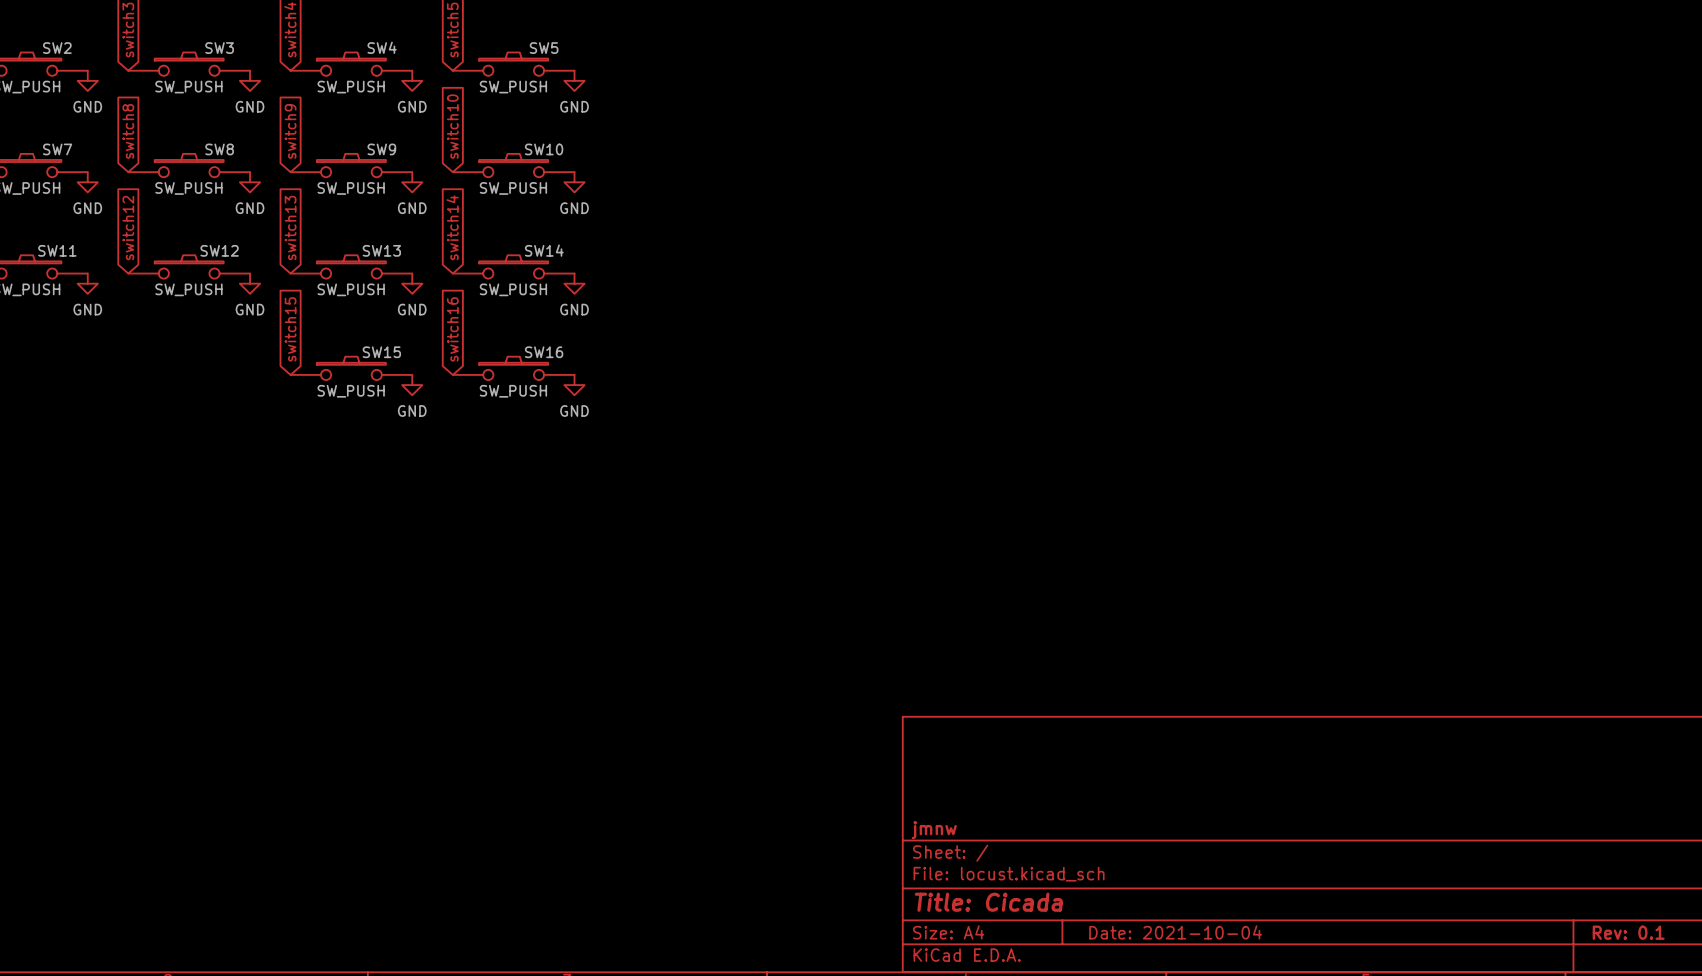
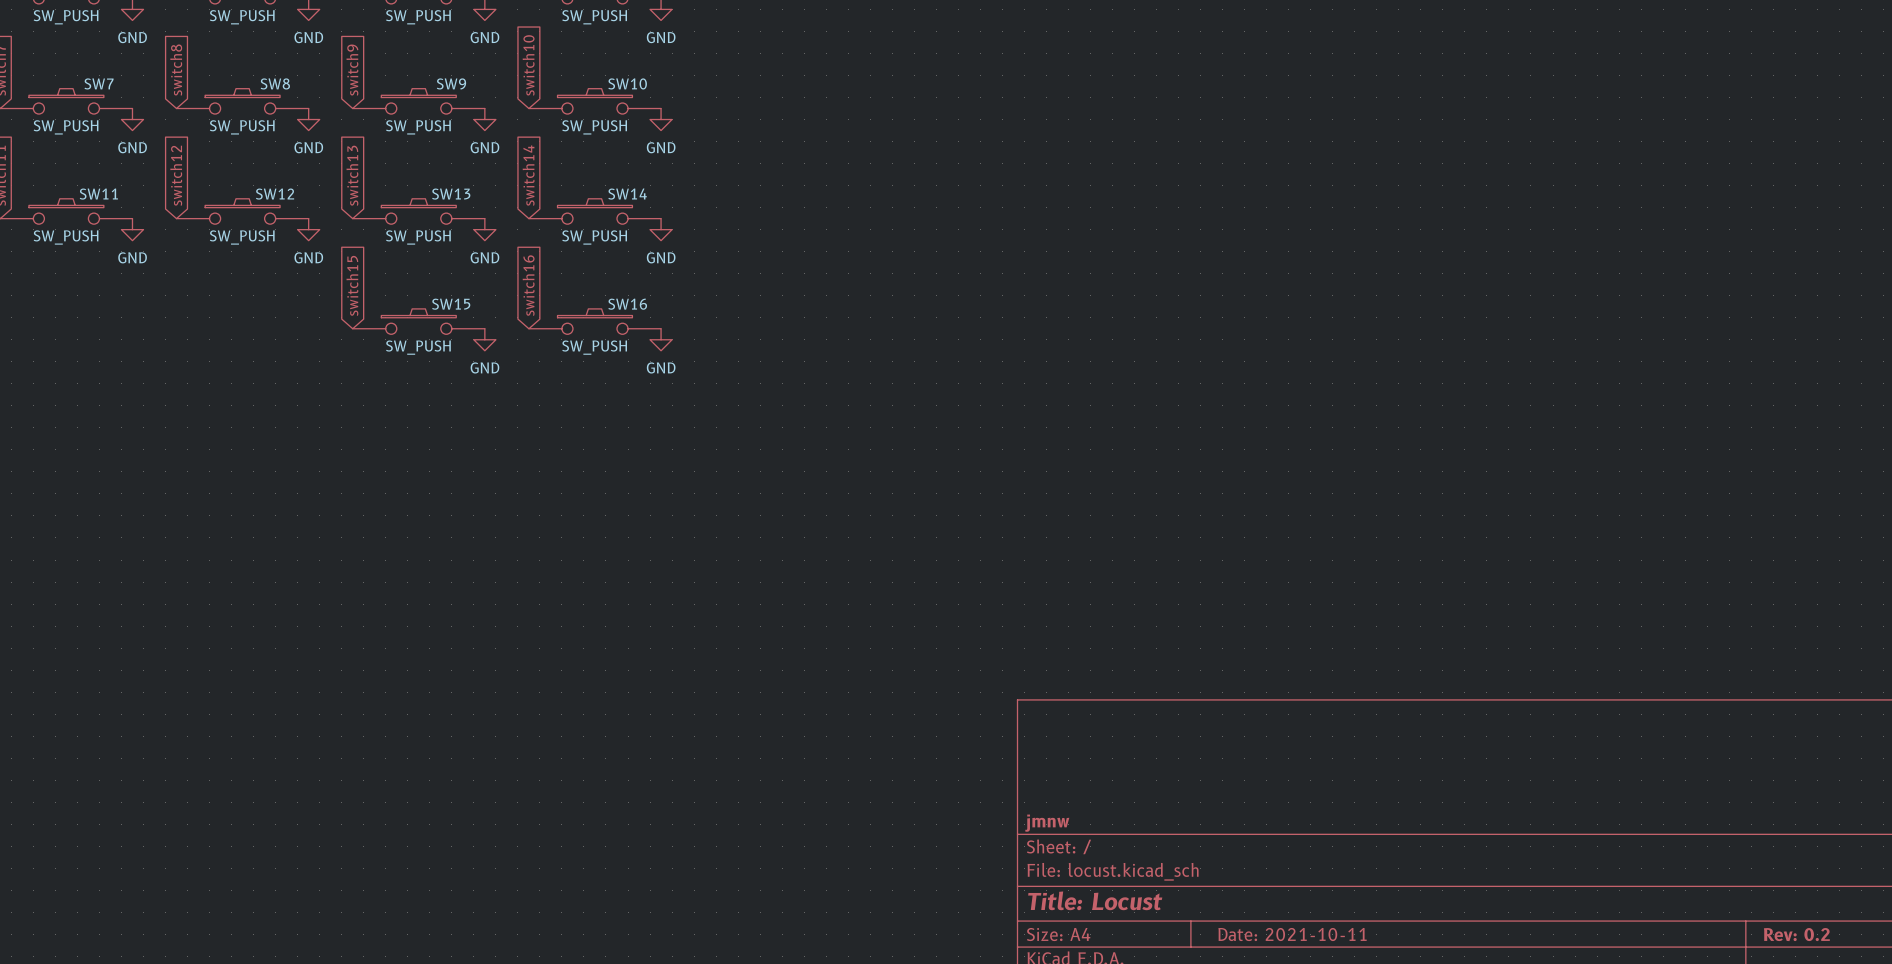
title block: Title: Cicada (988, 902) -> Title: Locust (1095, 900)
title block: Date: 2021-10-04 (1175, 932) -> Date: 2021-10-11 (1292, 934)
title block: Rev: 0.1 (1628, 932) -> Rev: 0.2 (1796, 934)

